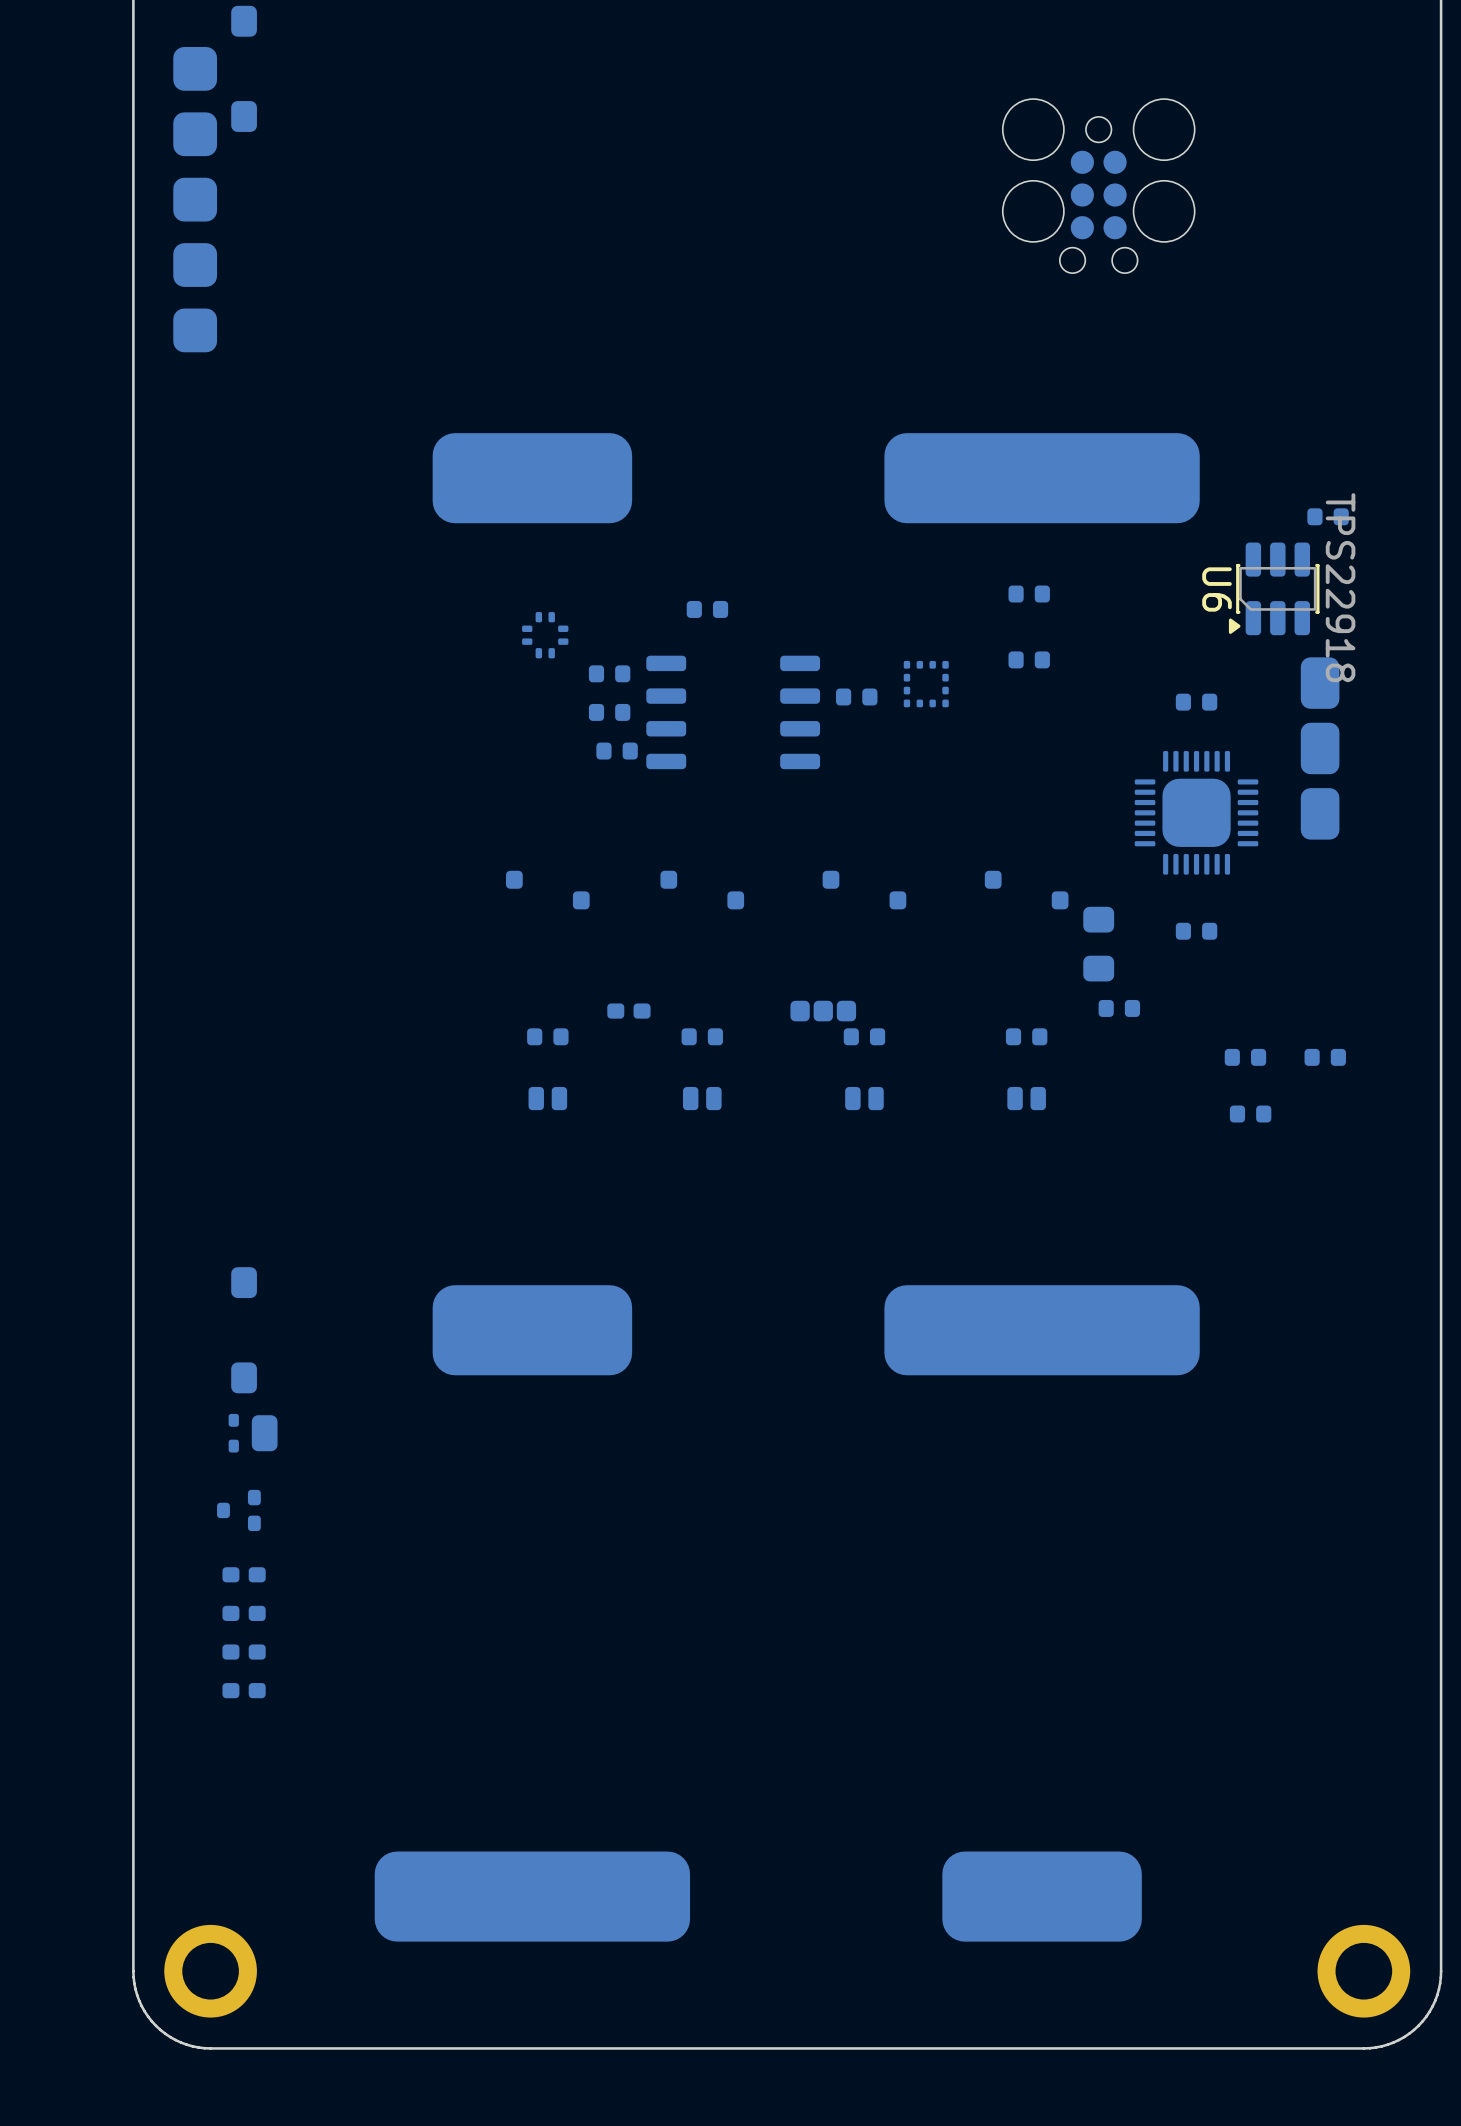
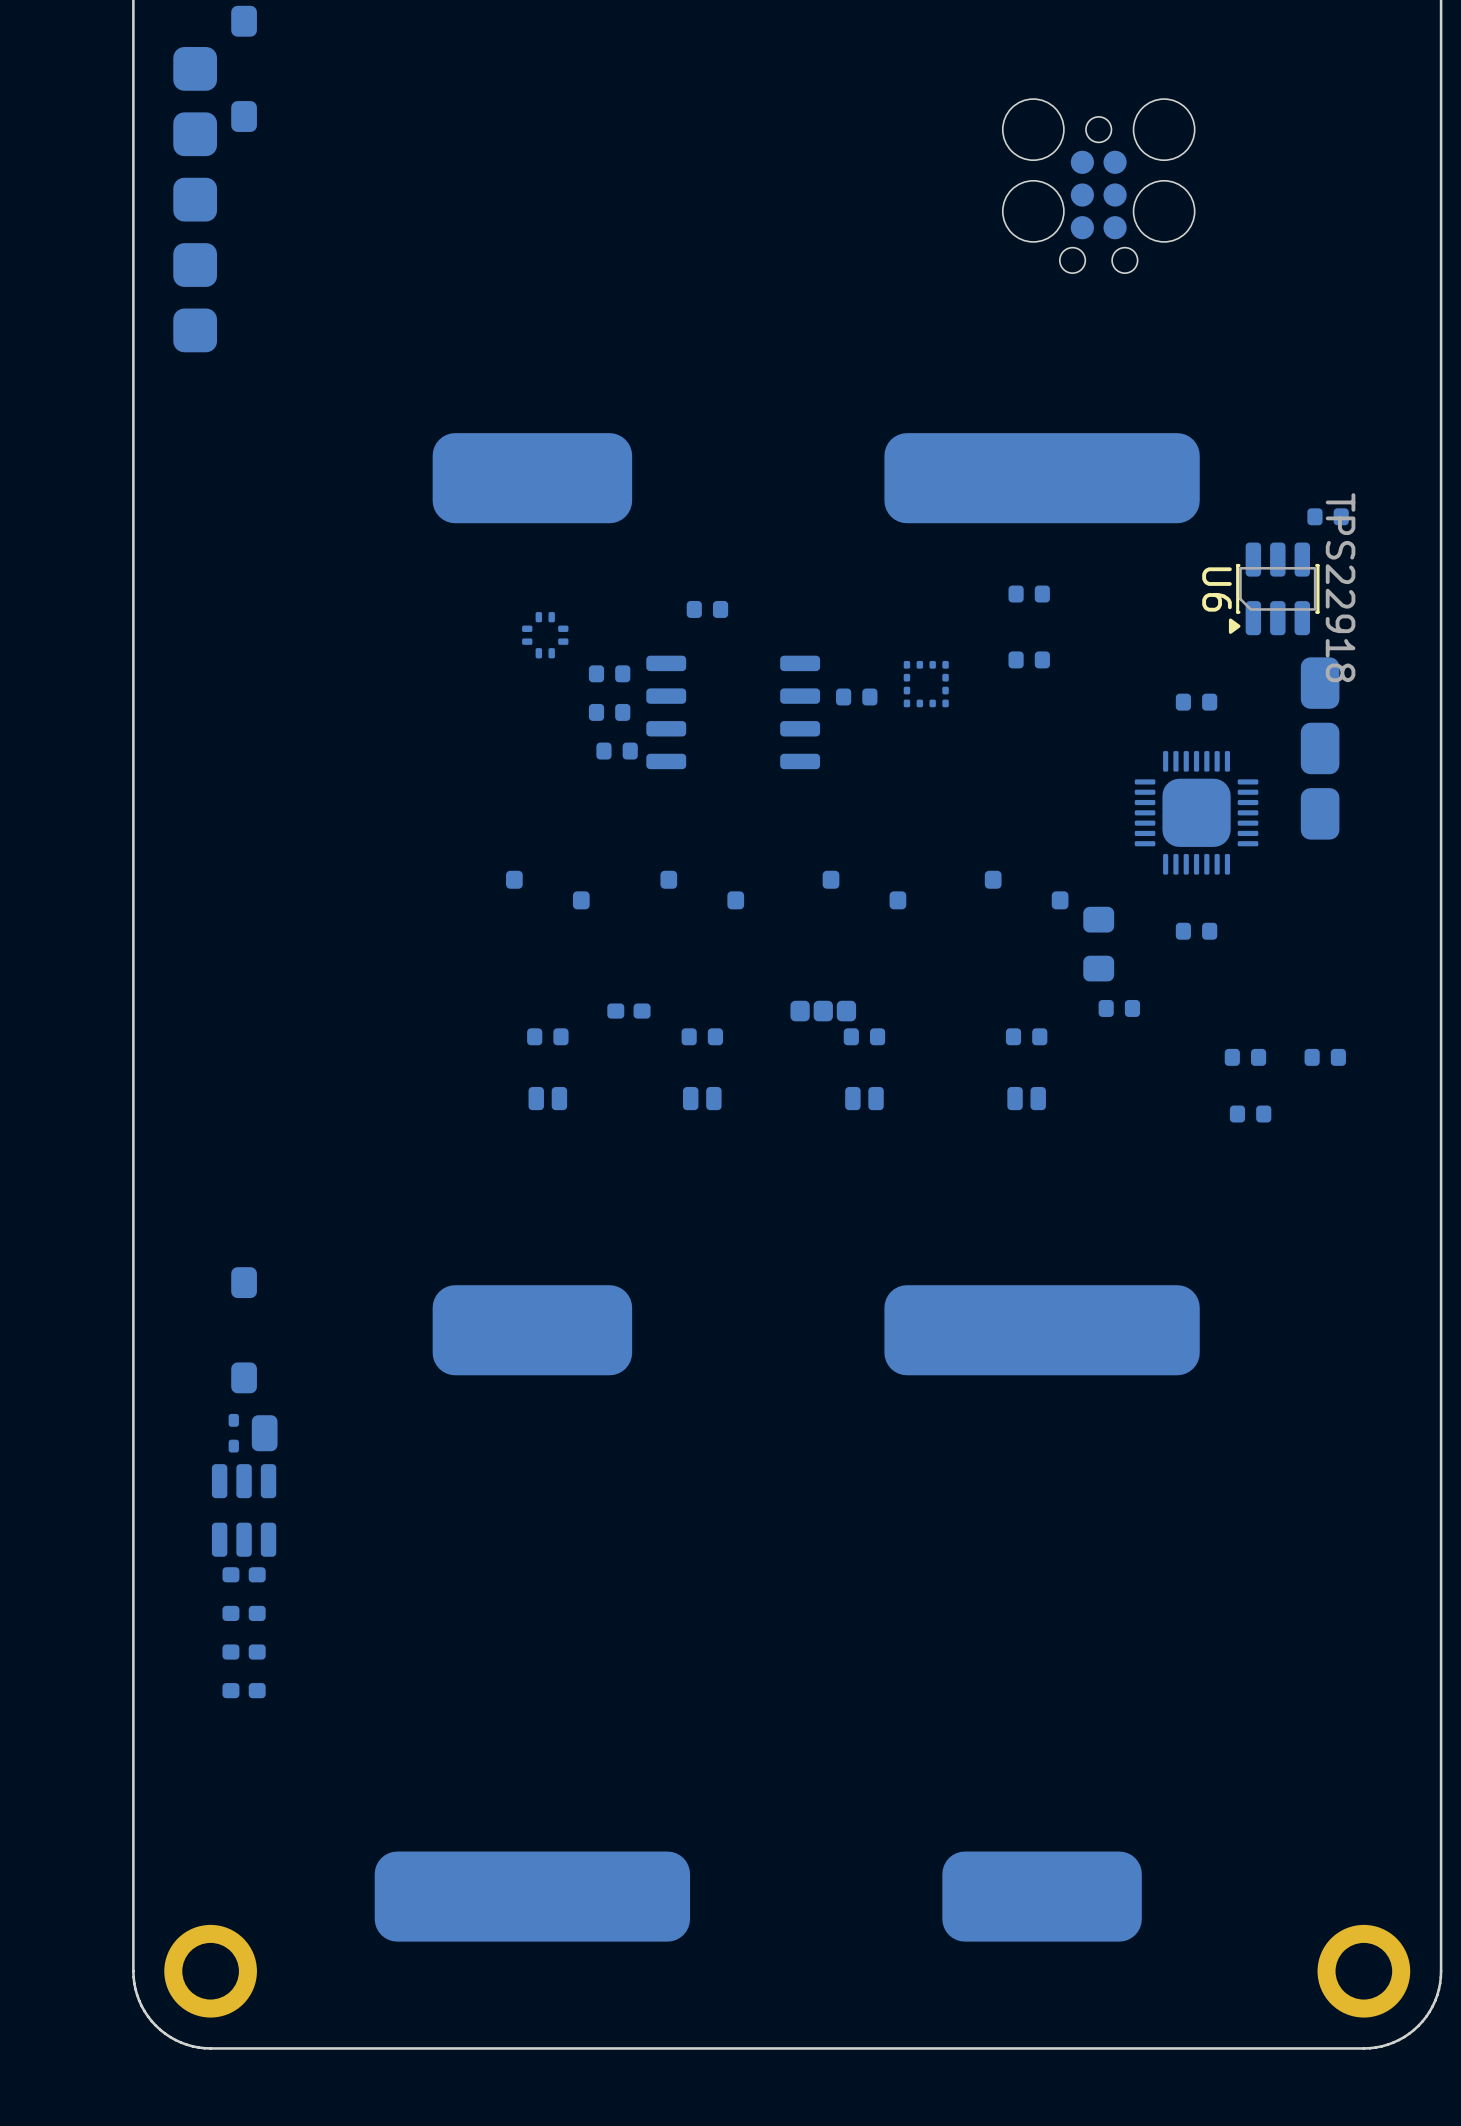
part footprint: [217, 1489, 261, 1532] -> [211, 1464, 277, 1557]

